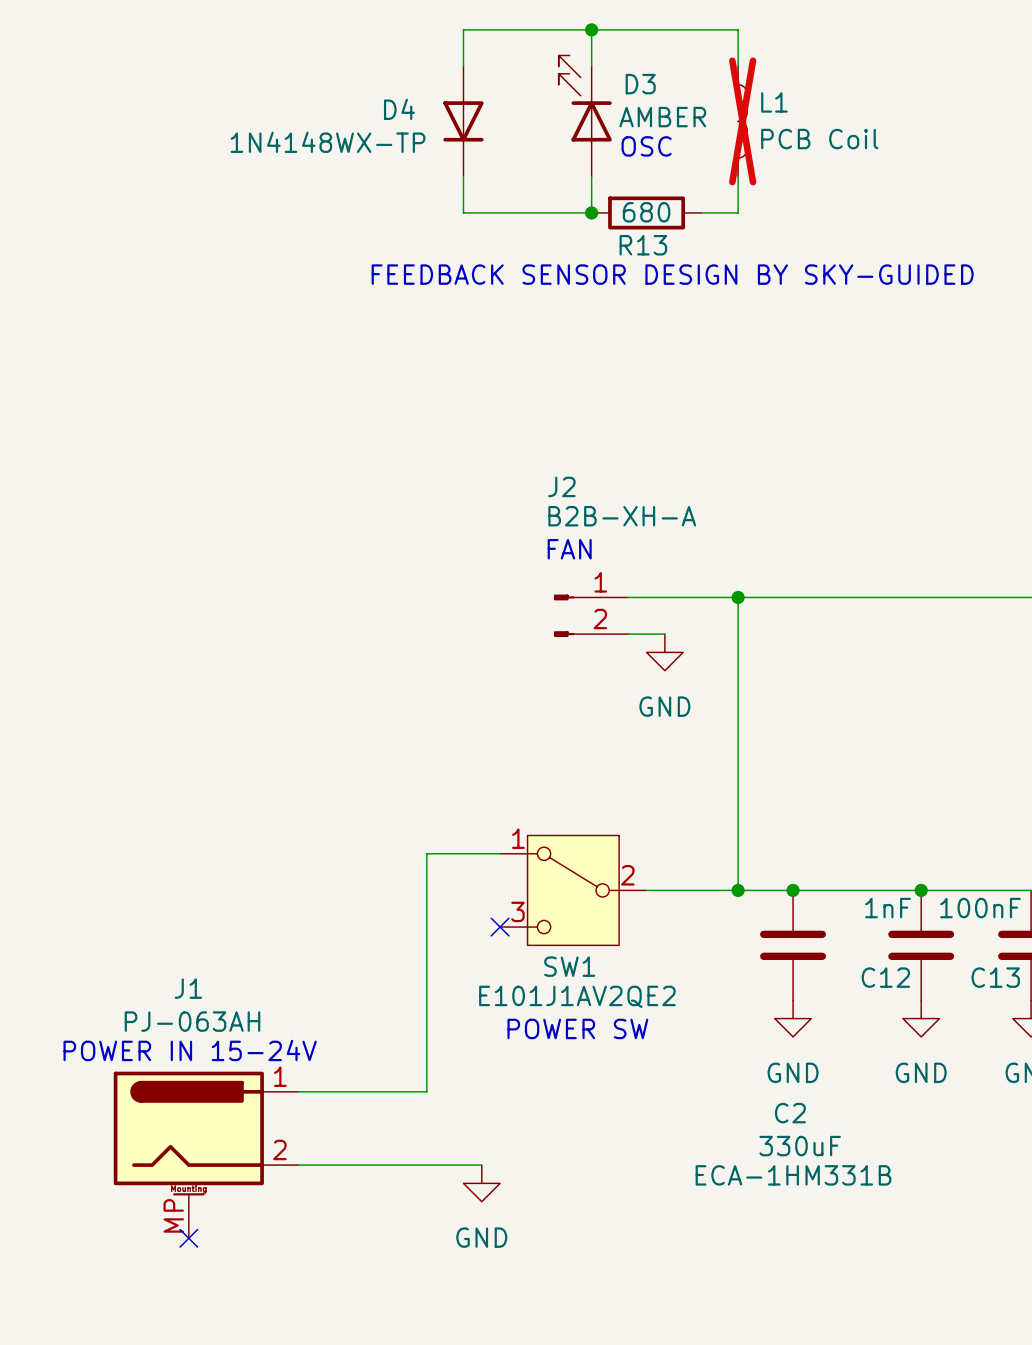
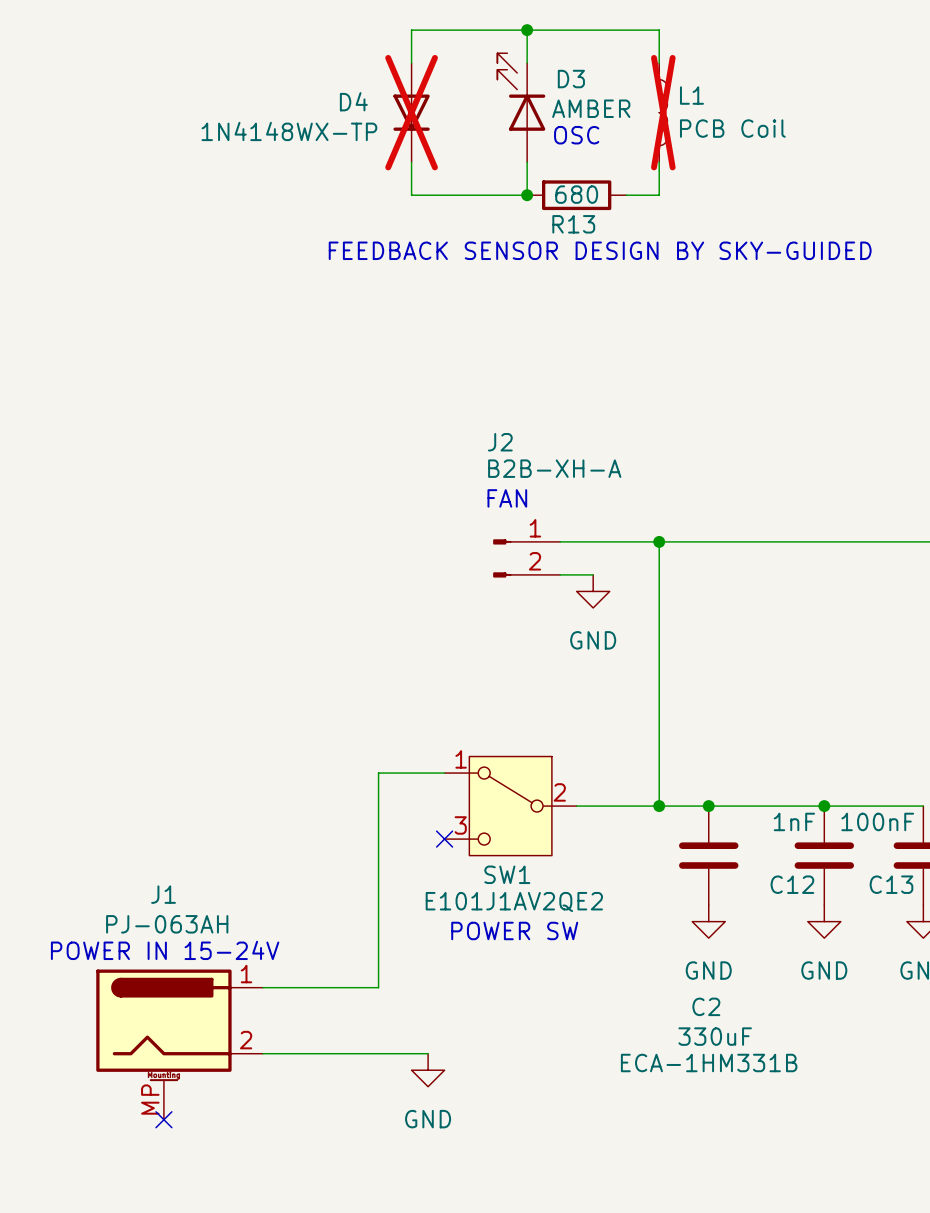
D4 do-not-place cross: none -> (411, 112)

